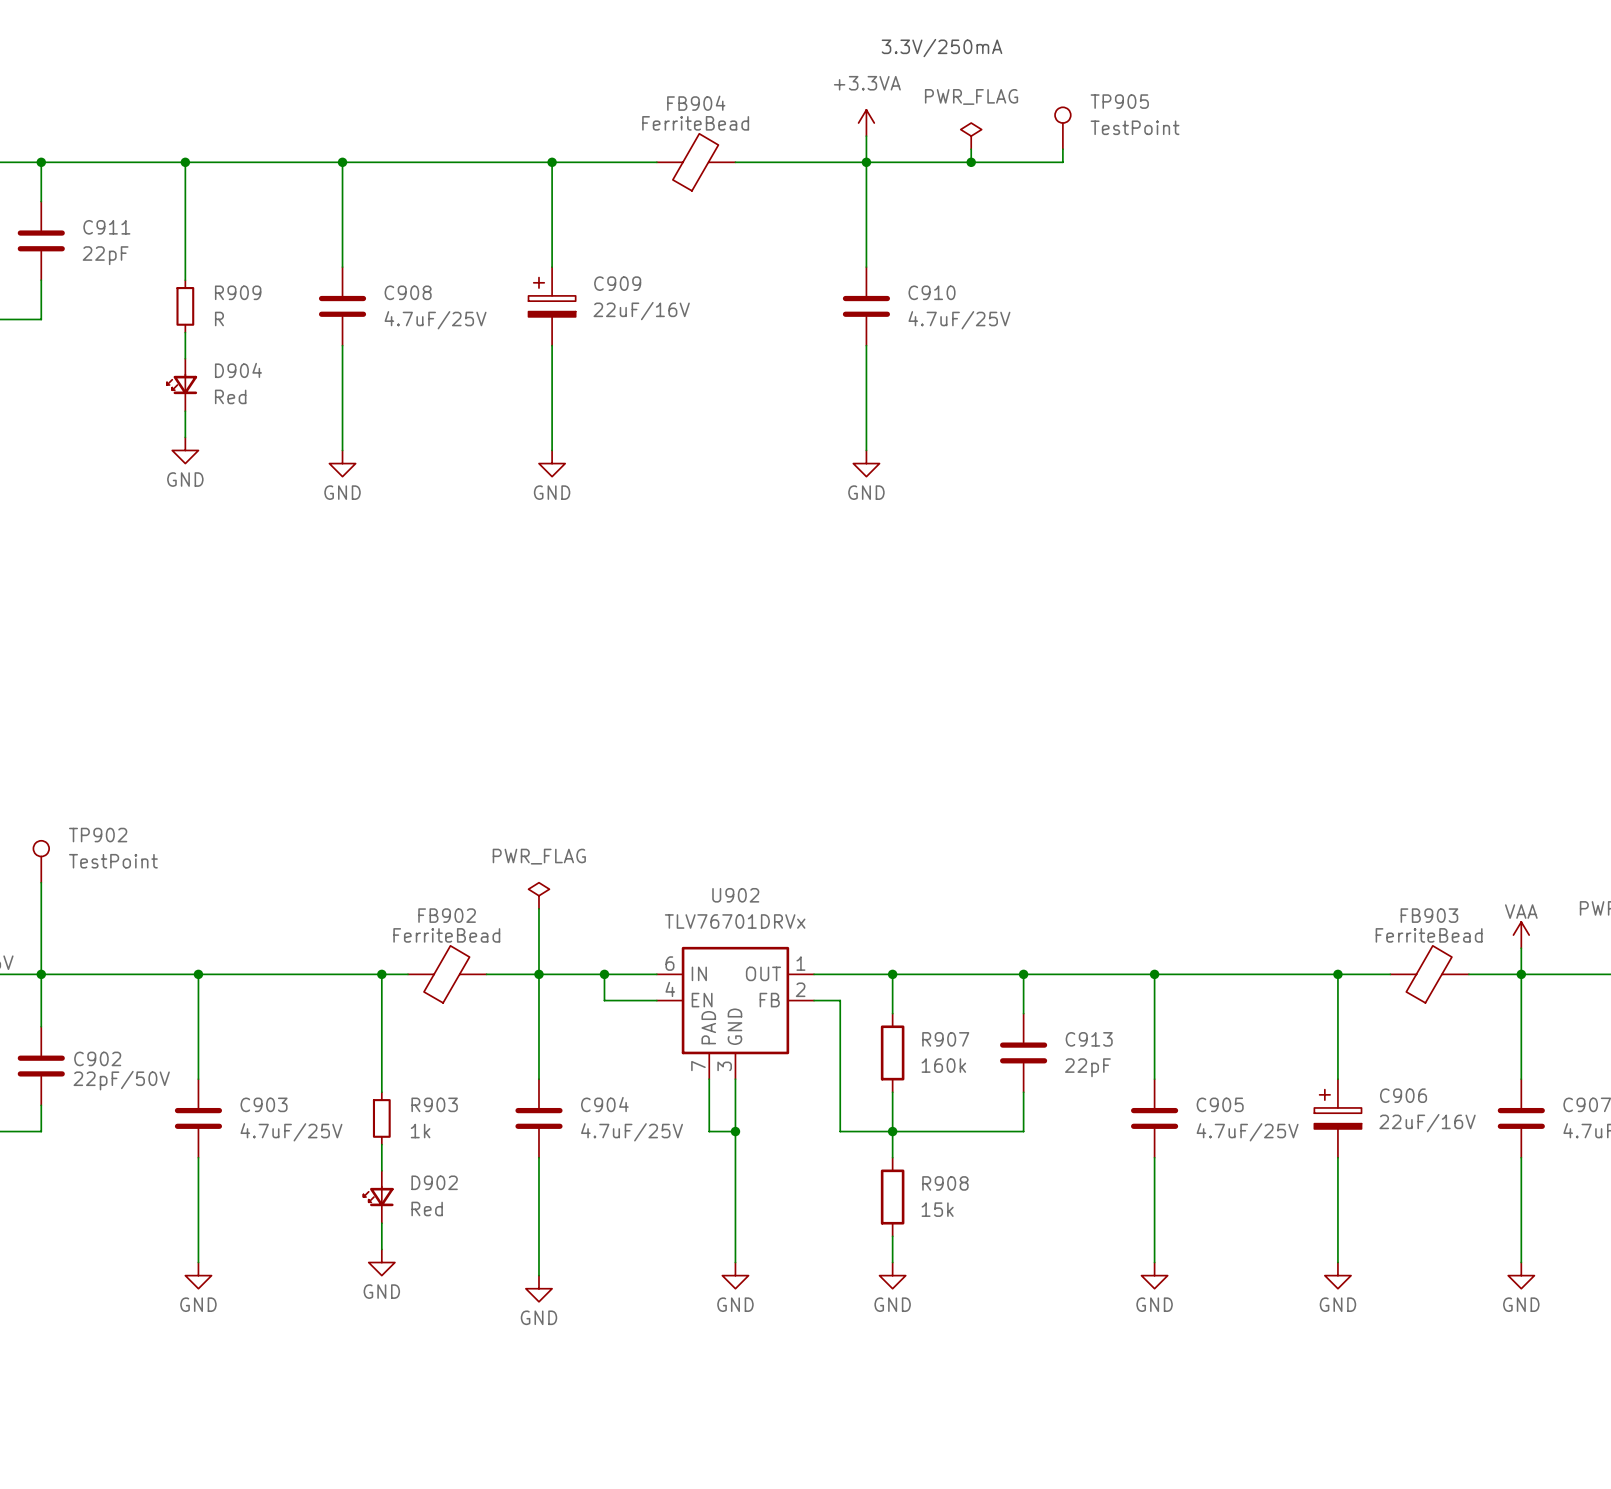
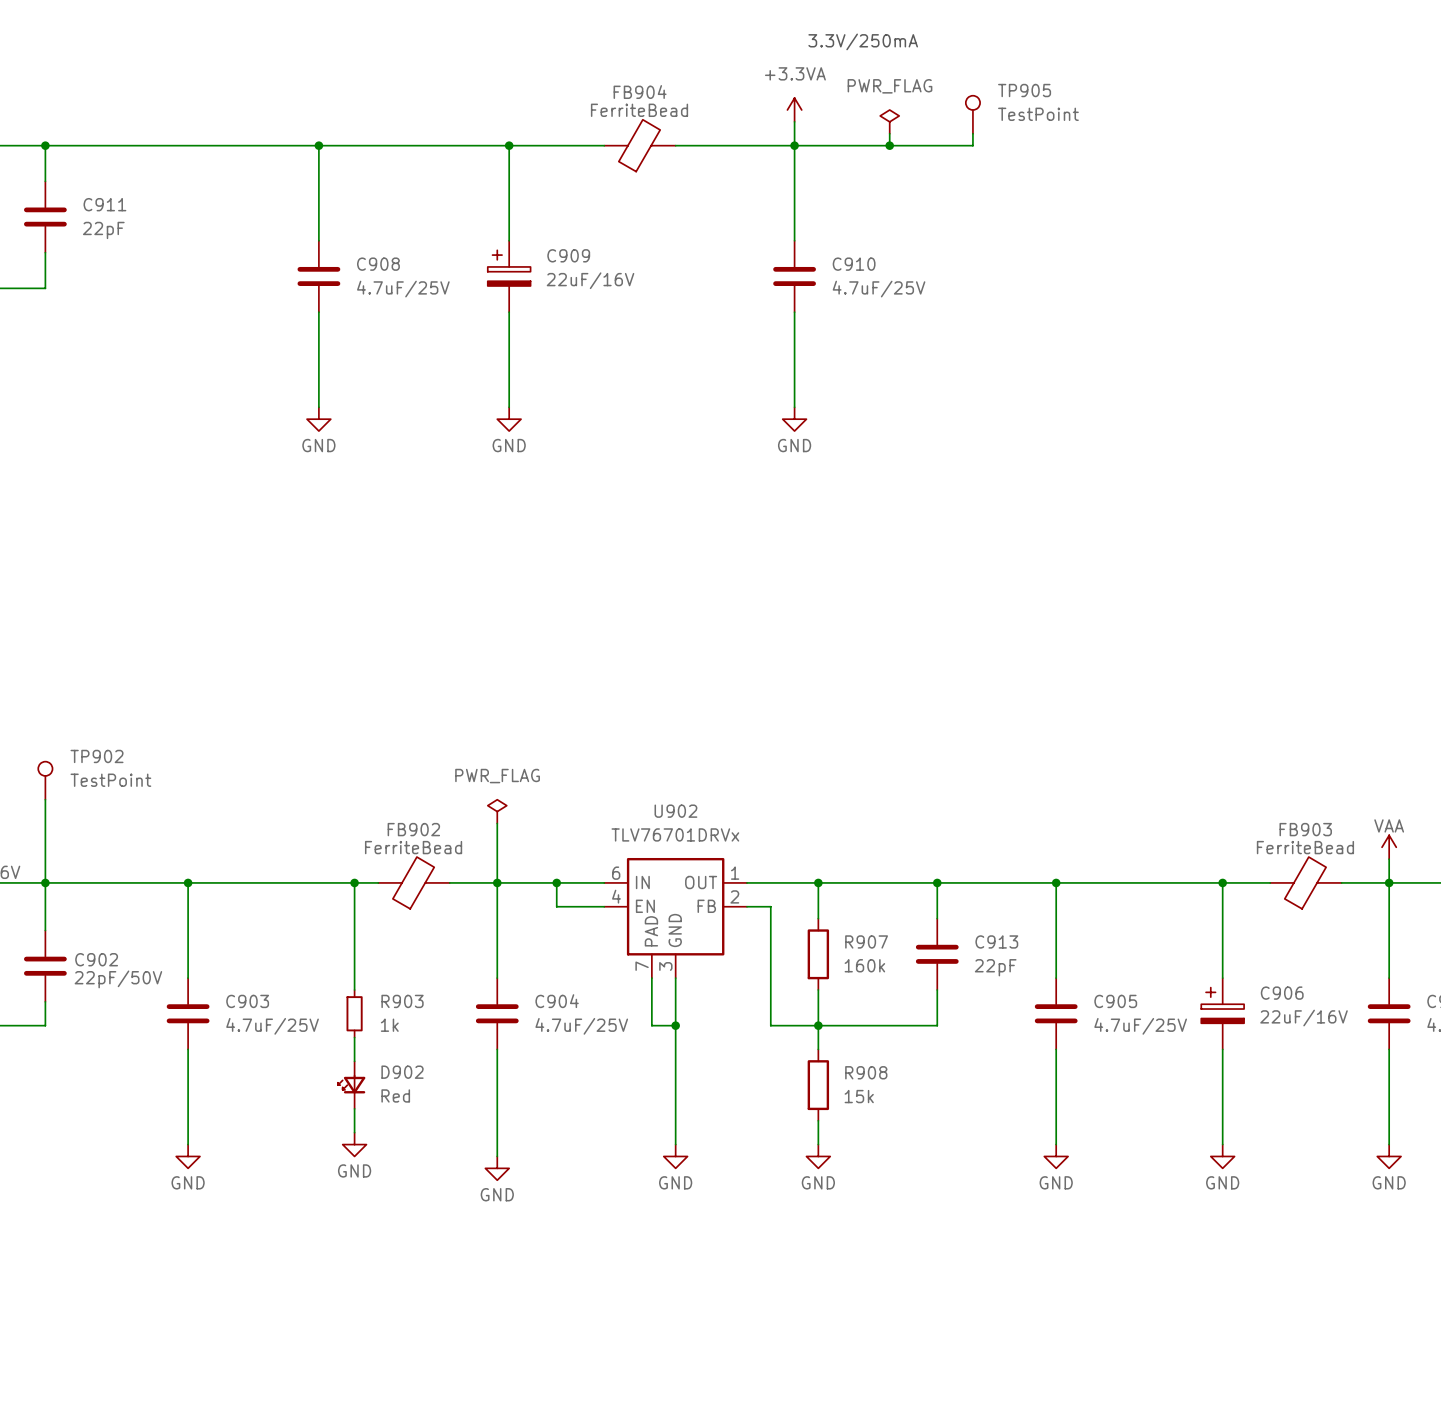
wire: (185, 162) (185, 280) -> none
junction: (185, 162) -> none
R909: R (185, 306) -> none
wire: (185, 332) (185, 358) -> none
D904: Red (182, 384) -> none
wire: (185, 411) (185, 437) -> none
power symbol: GND (185, 450) -> none

